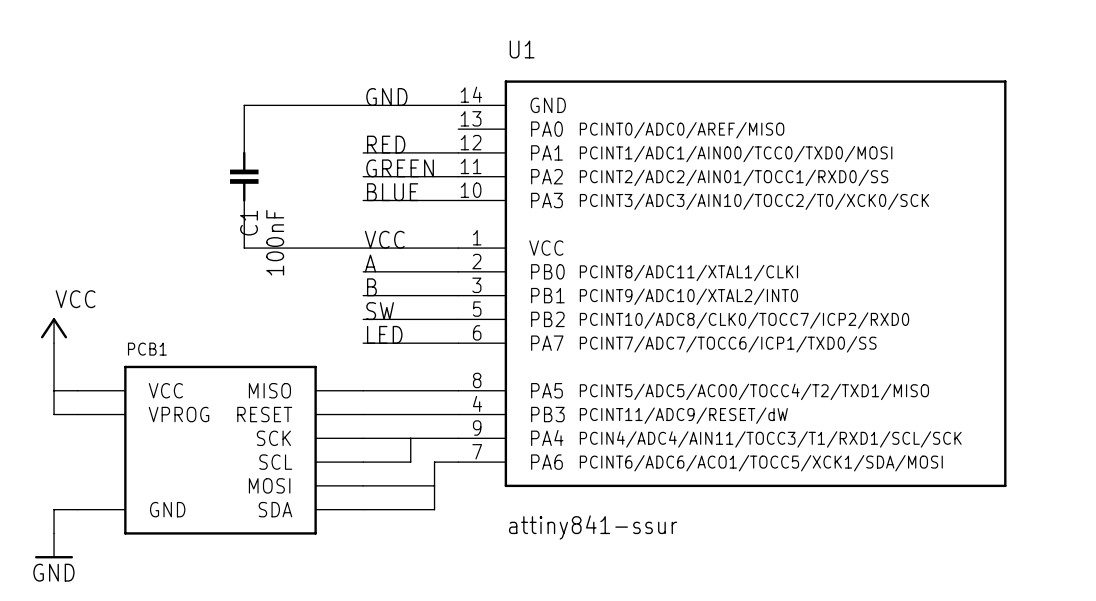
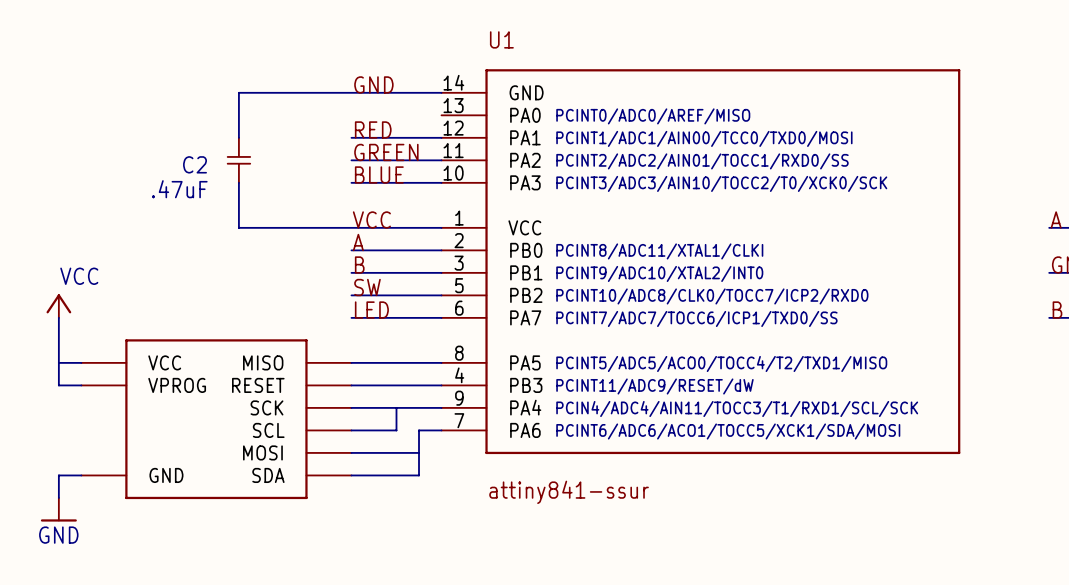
C1: 100nF (244, 176) -> none
C2: none -> .47uF (238, 160)
PCB1 name: PCB1 (147, 349) -> none

